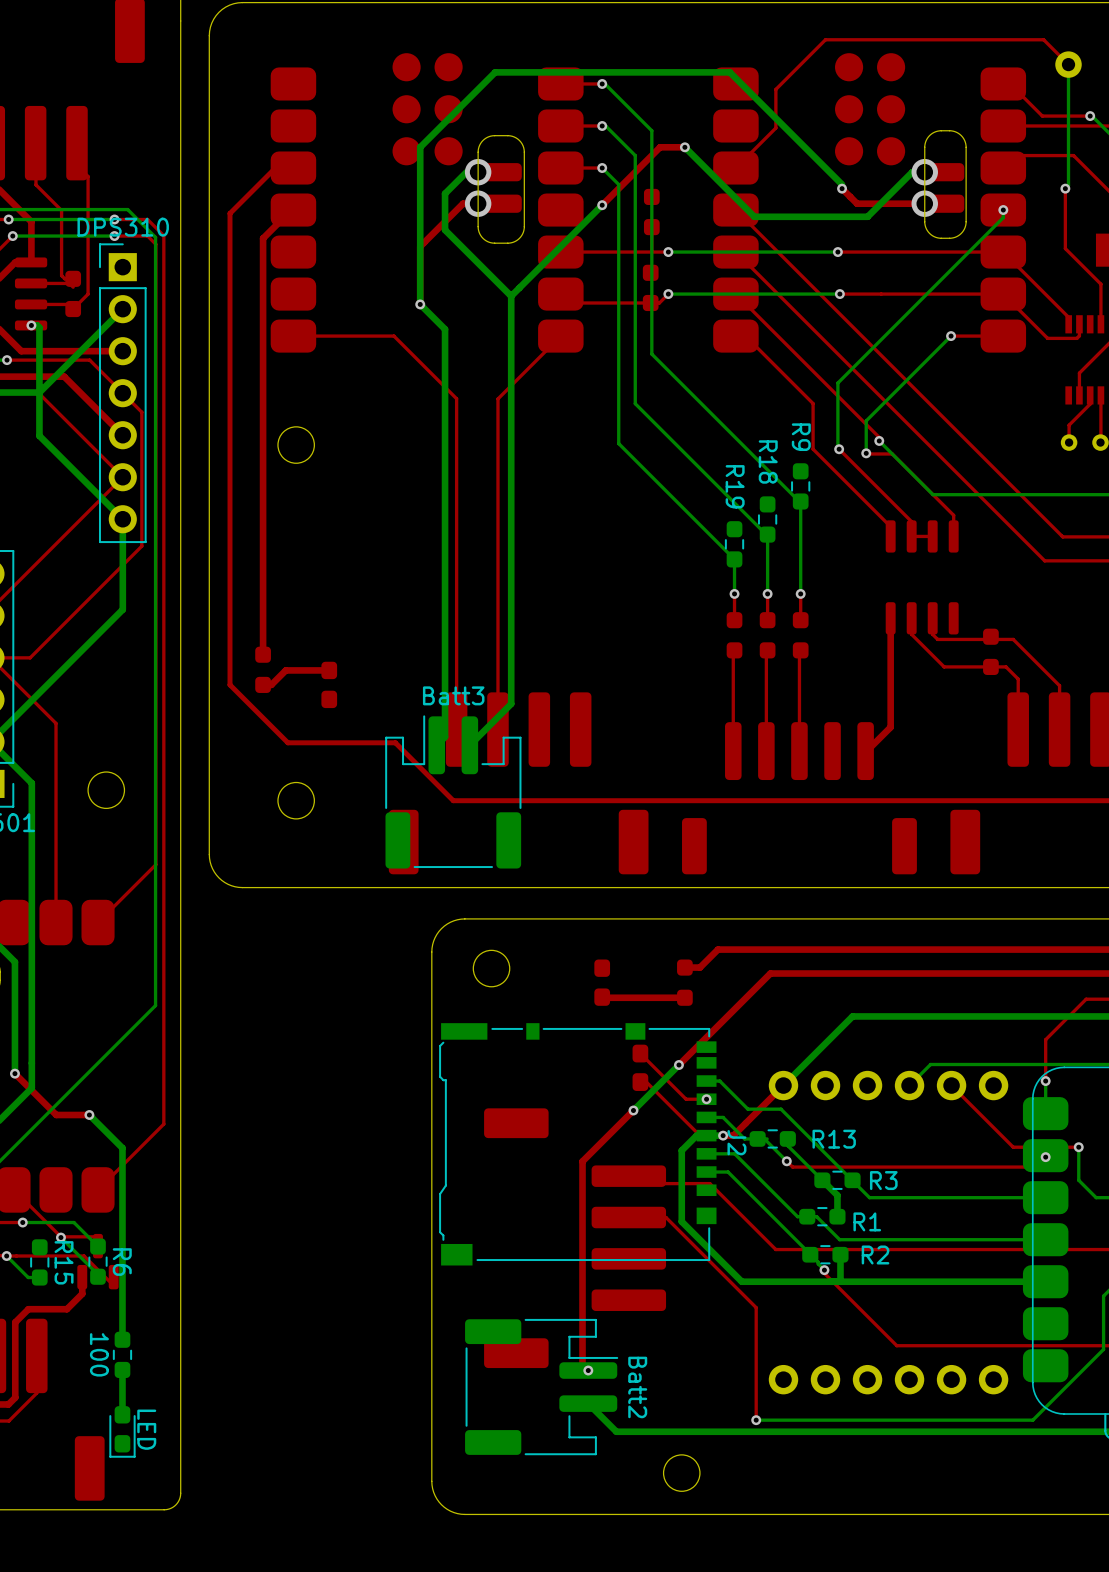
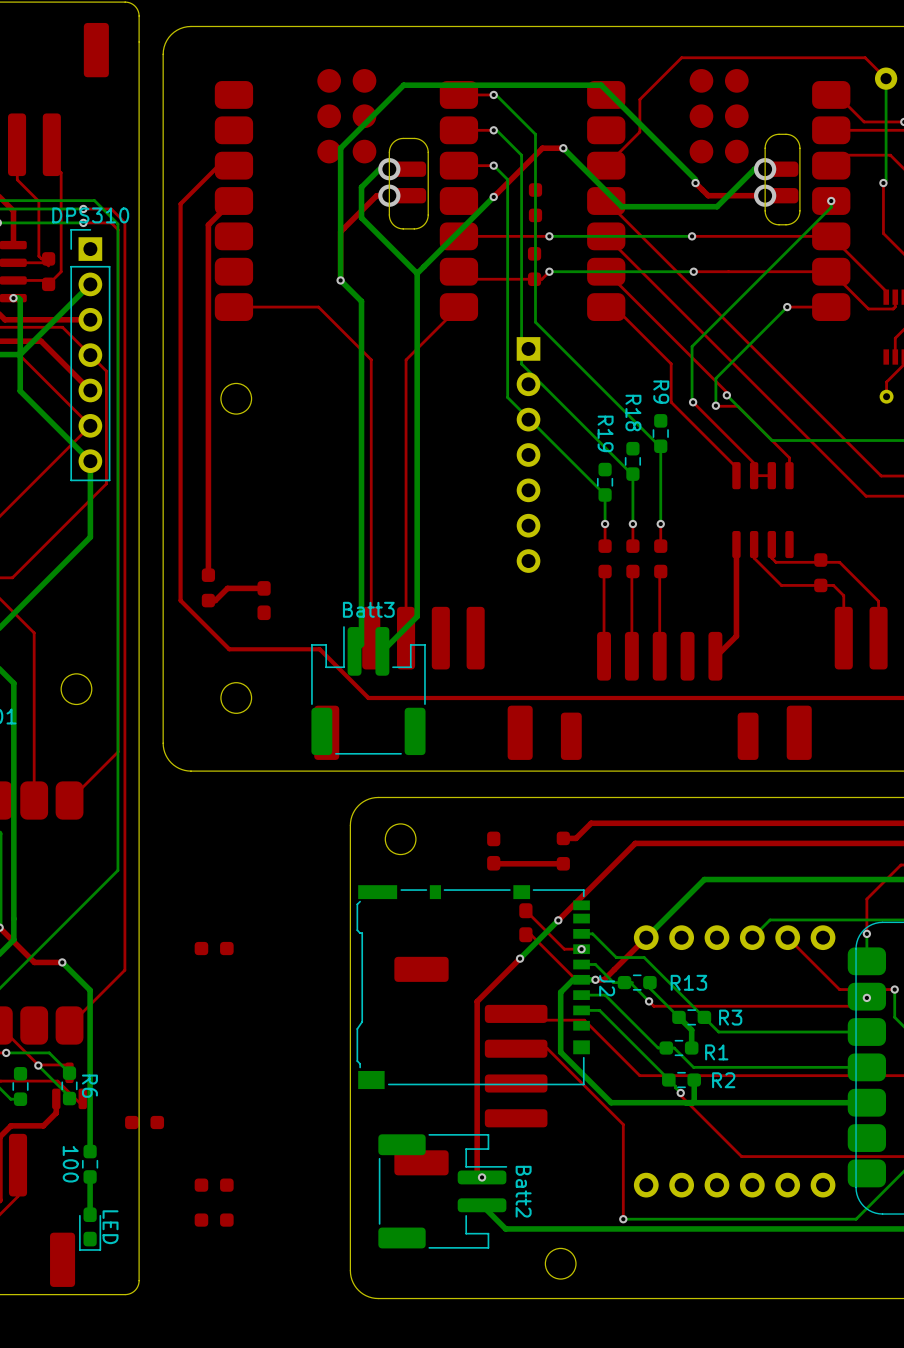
part: none -> (528, 454)
part: none -> (214, 948)
R15 name: R15 (64, 1262) -> none
part: none -> (144, 1122)
part: none -> (214, 1185)
part: none -> (214, 1220)

